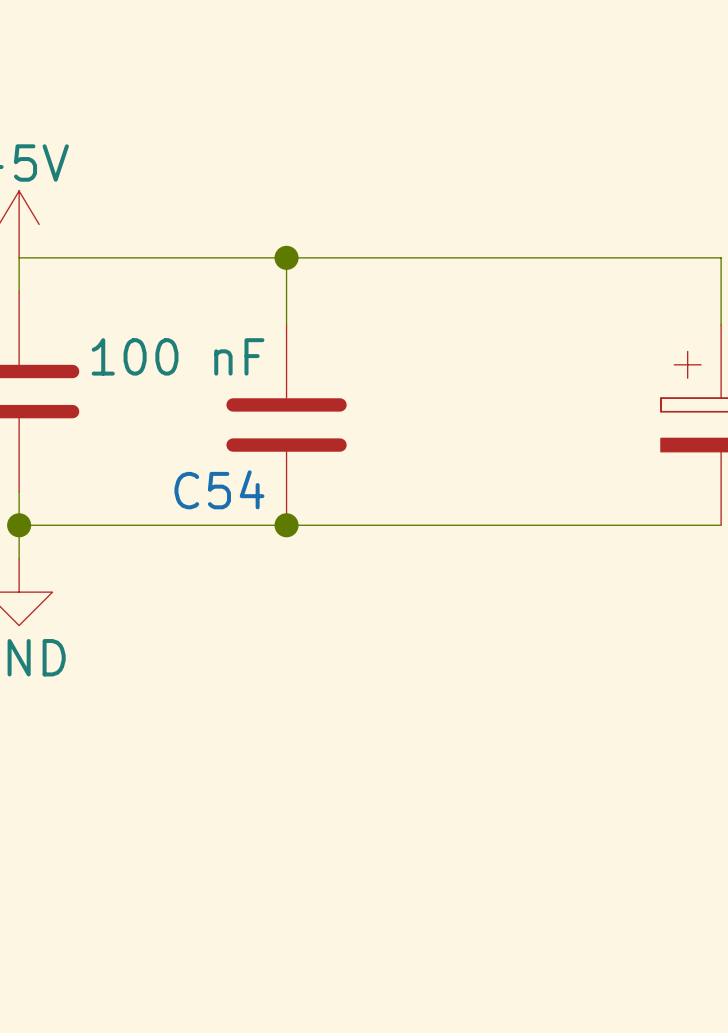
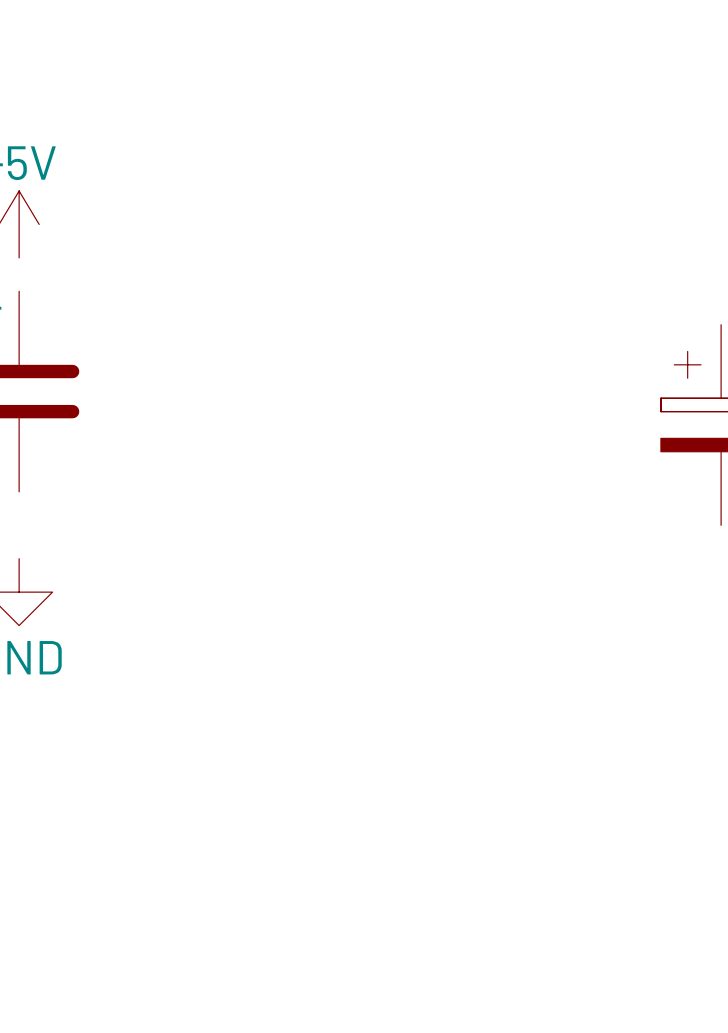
wire: (286, 257) (286, 324) -> none
junction: (286, 257) -> none
wire: (19, 291) (19, 257) (721, 257) (721, 324) -> none
C54: 100 nF (286, 424) -> none
wire: (19, 491) (19, 558) -> none
wire: (19, 525) (721, 525) -> none
junction: (19, 525) -> none
junction: (286, 525) -> none

